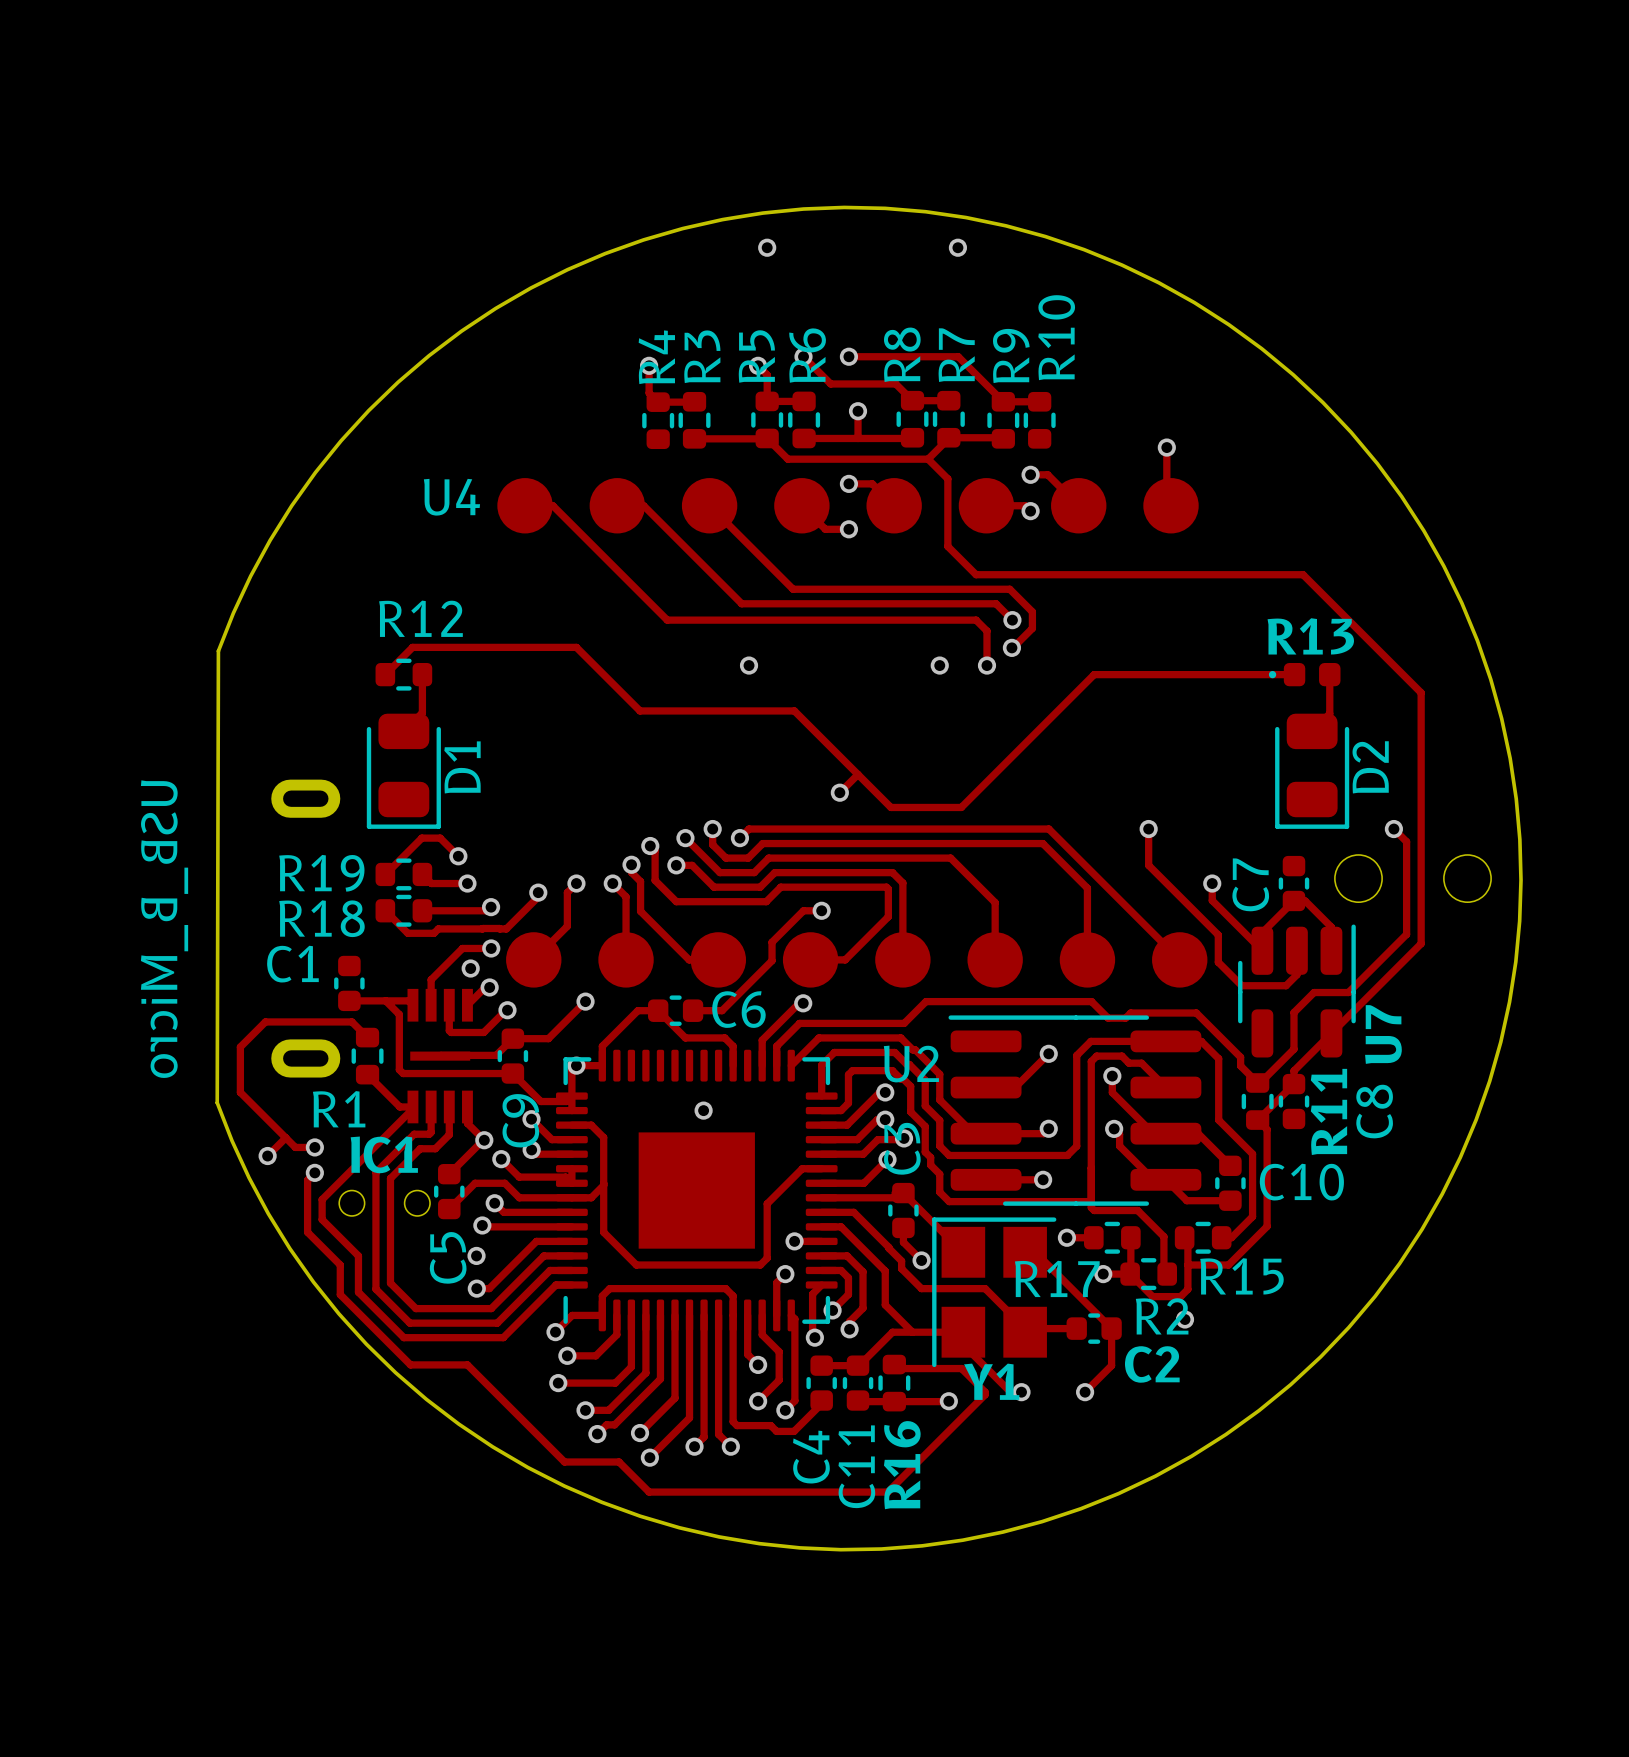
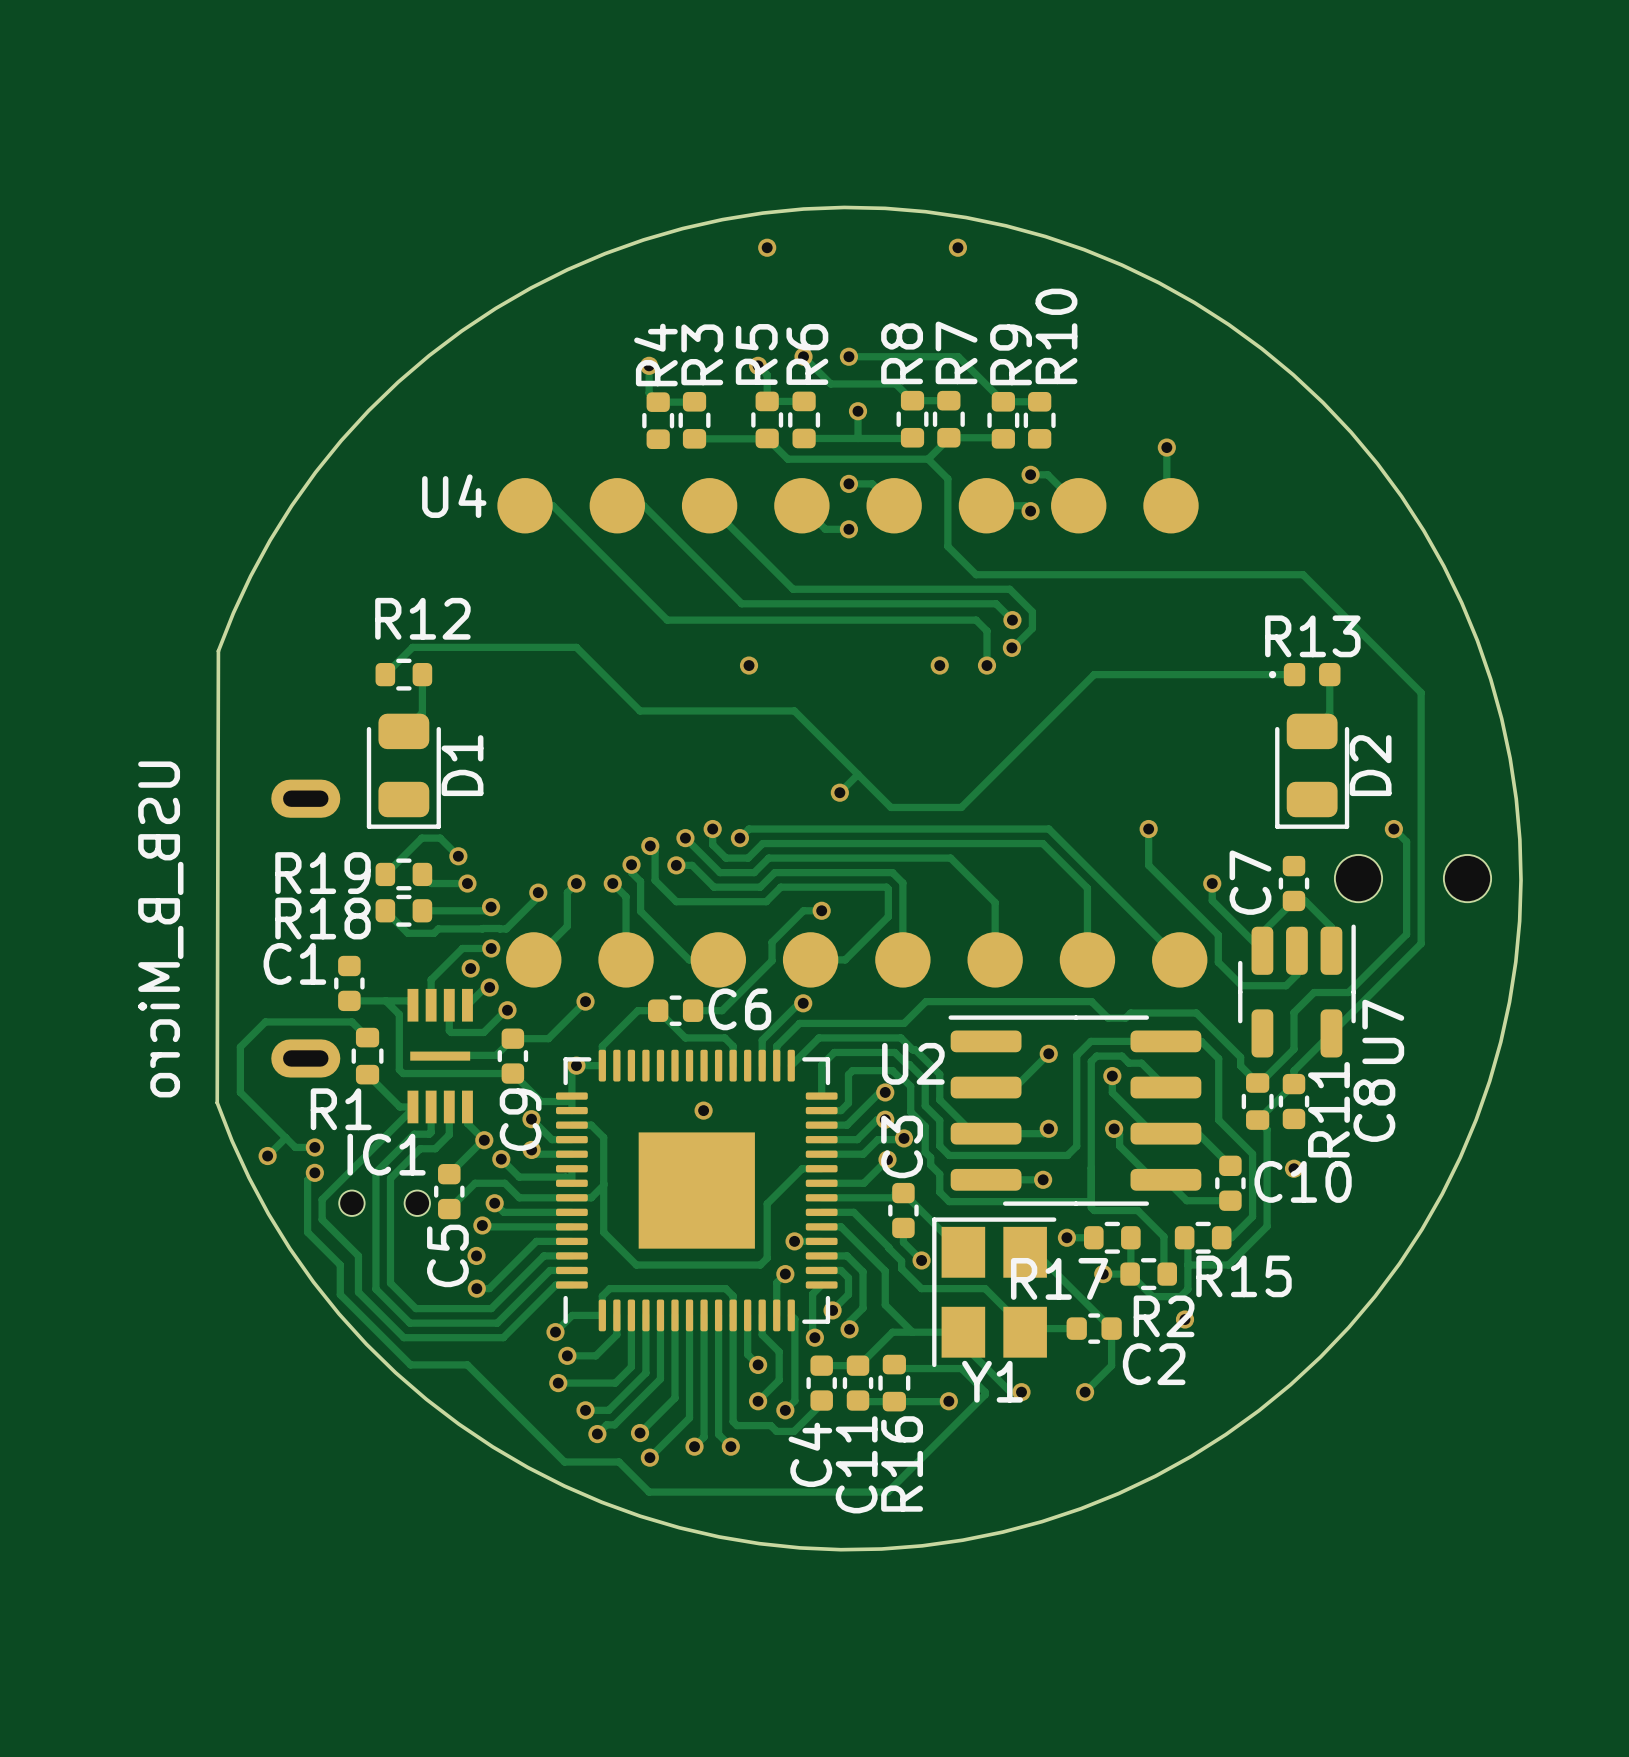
via: none -> (1293, 1168)

